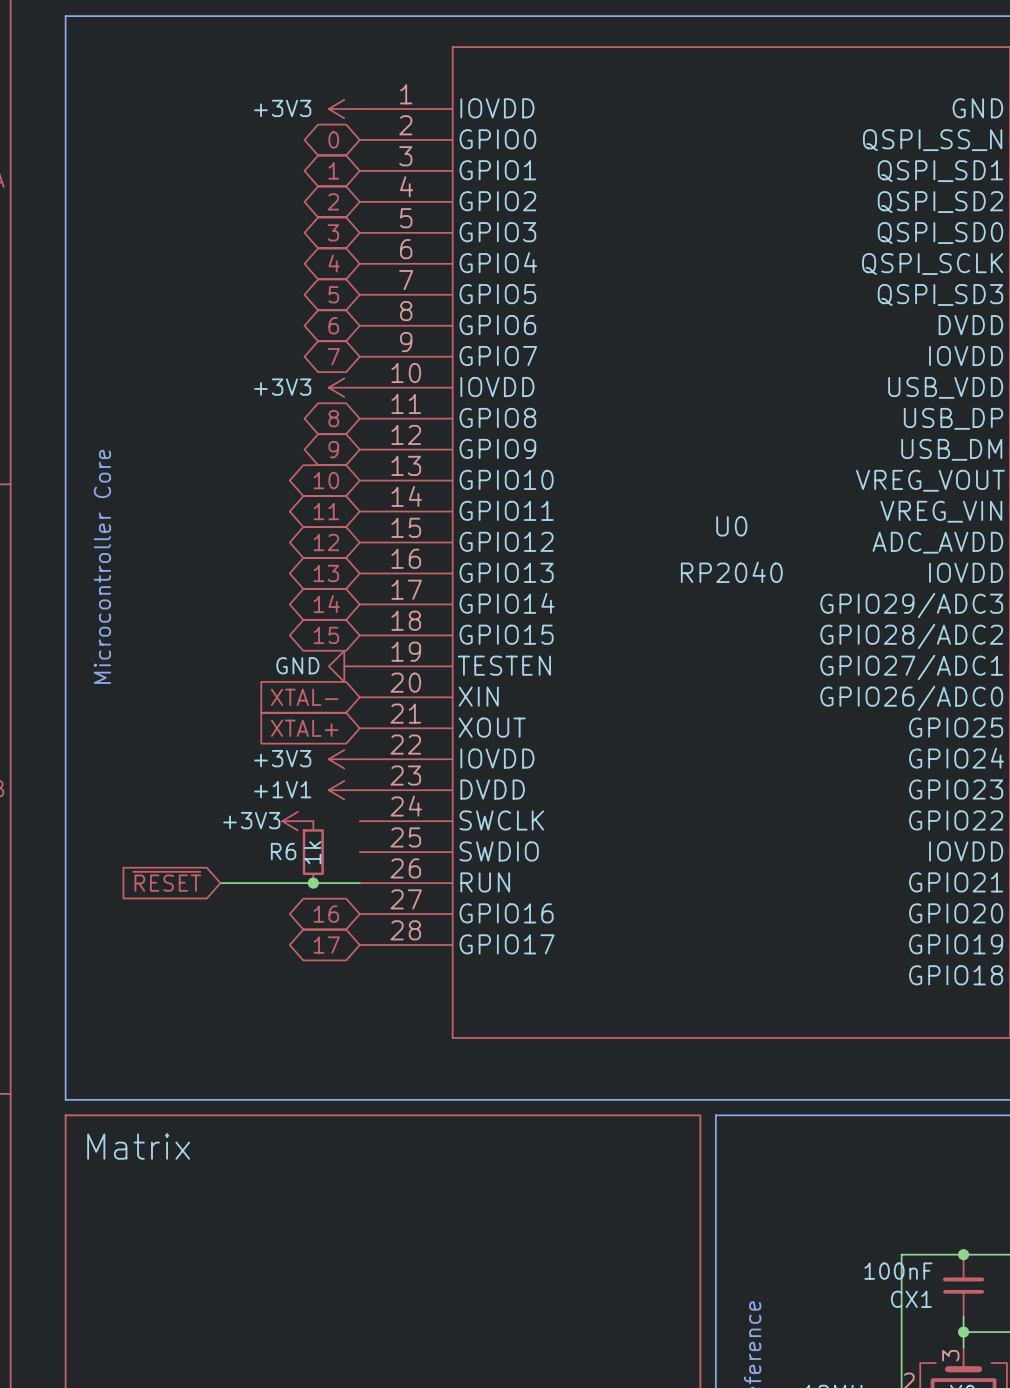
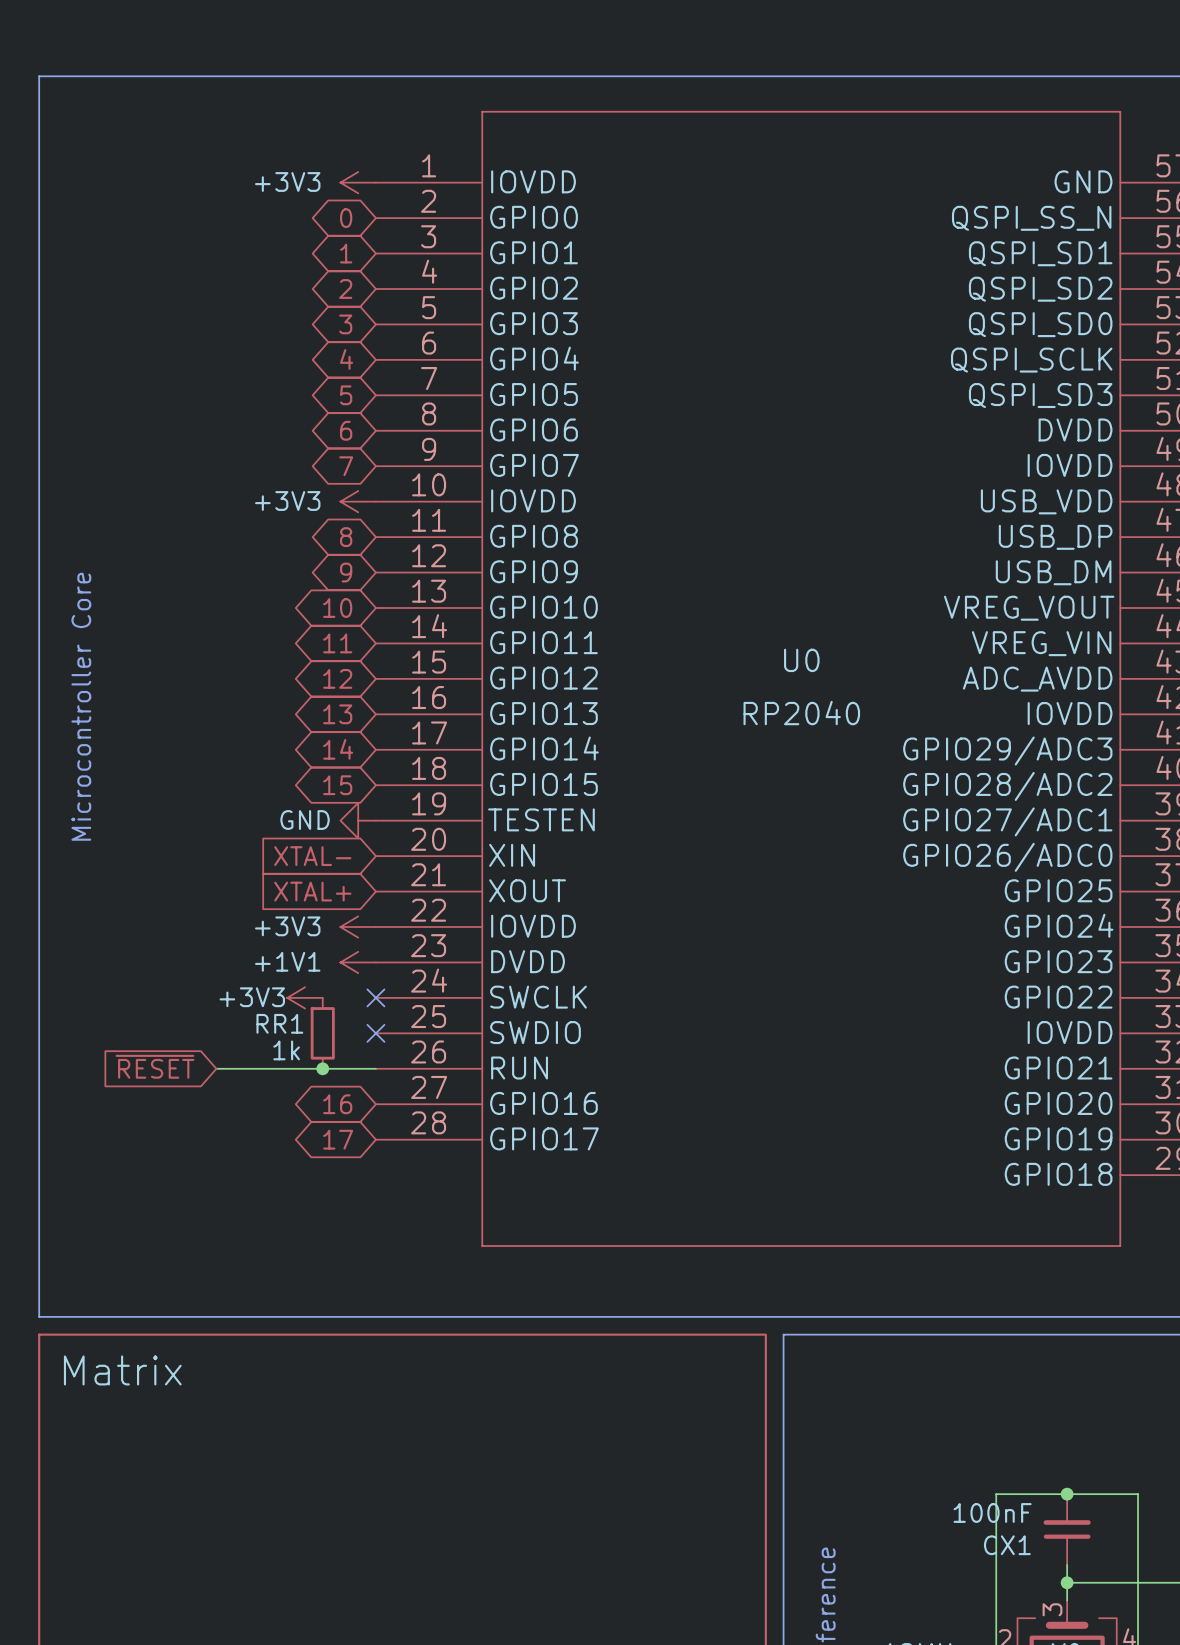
no-connect mark: none -> (375, 997)
R6 name: R6 (283, 851) -> RR1 (279, 1023)
R6 value rotation: 0° (312, 852) -> 90° clockwise (286, 1050)
no-connect mark: none -> (375, 1033)

